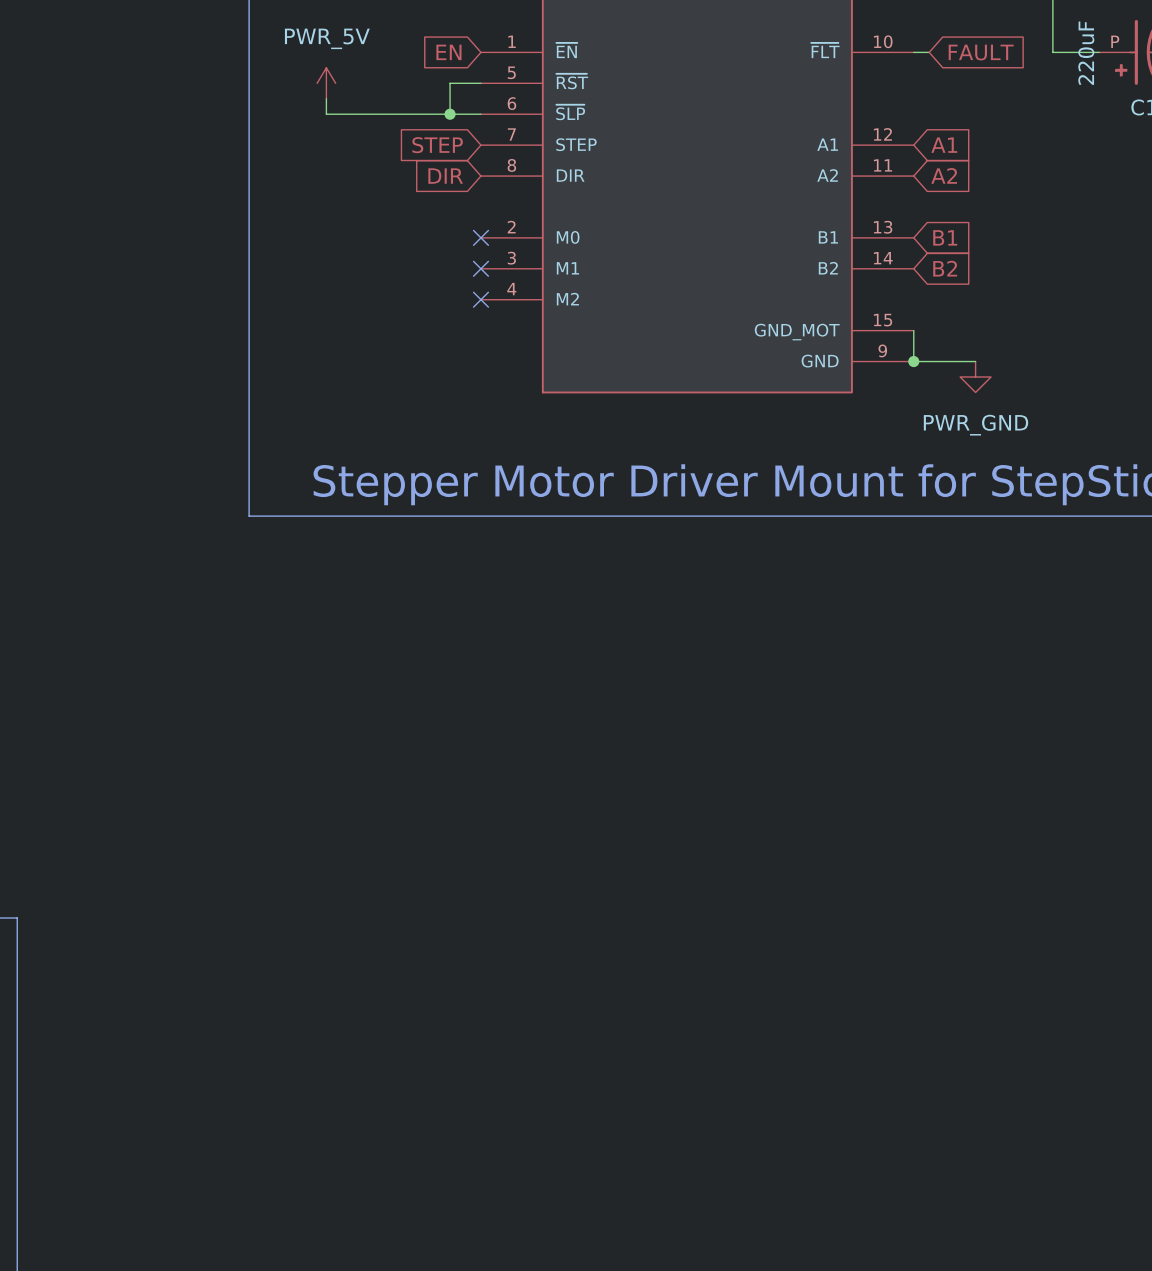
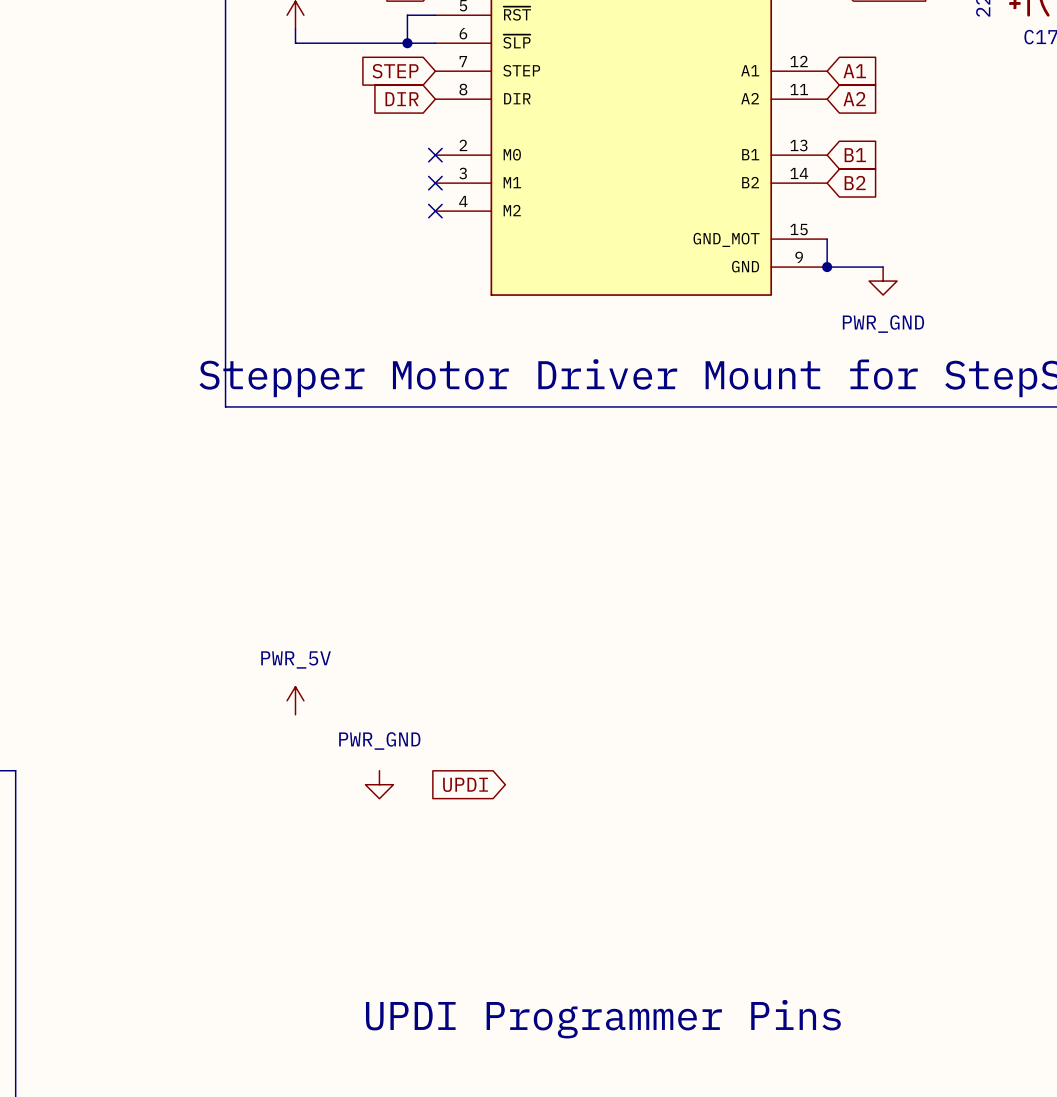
power symbol: none -> PWR_5V (295, 700)
power symbol: none -> PWR_GND (379, 784)
global label: none -> UPDI (465, 784)
text: none -> UPDI Programmer Pins (603, 1019)

